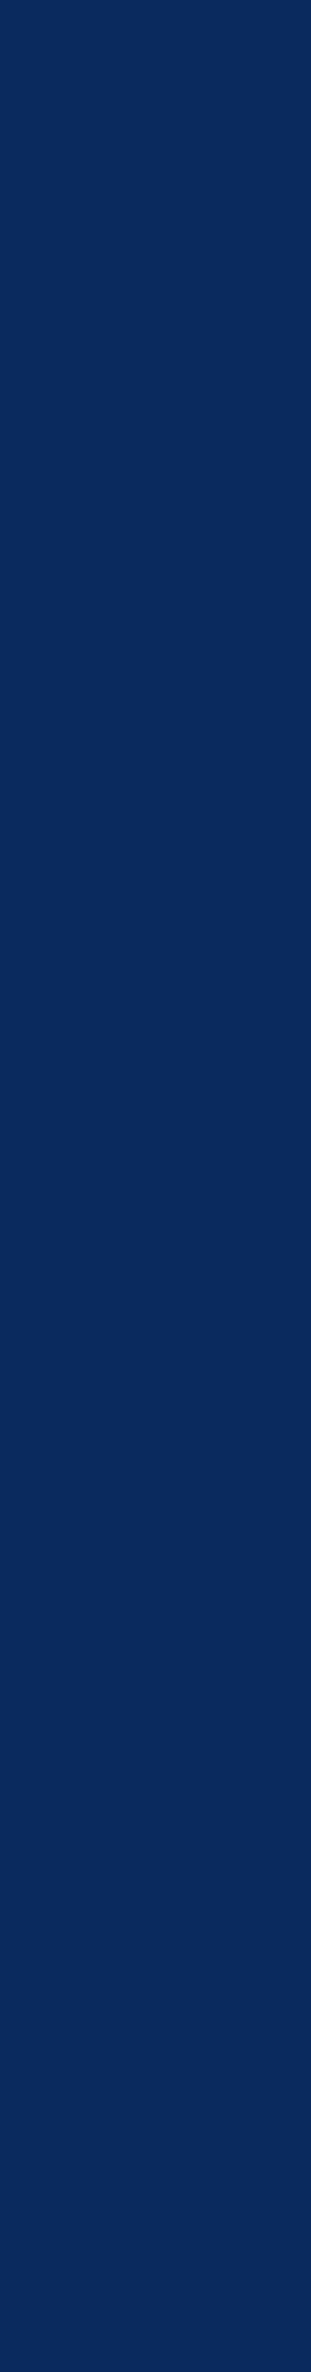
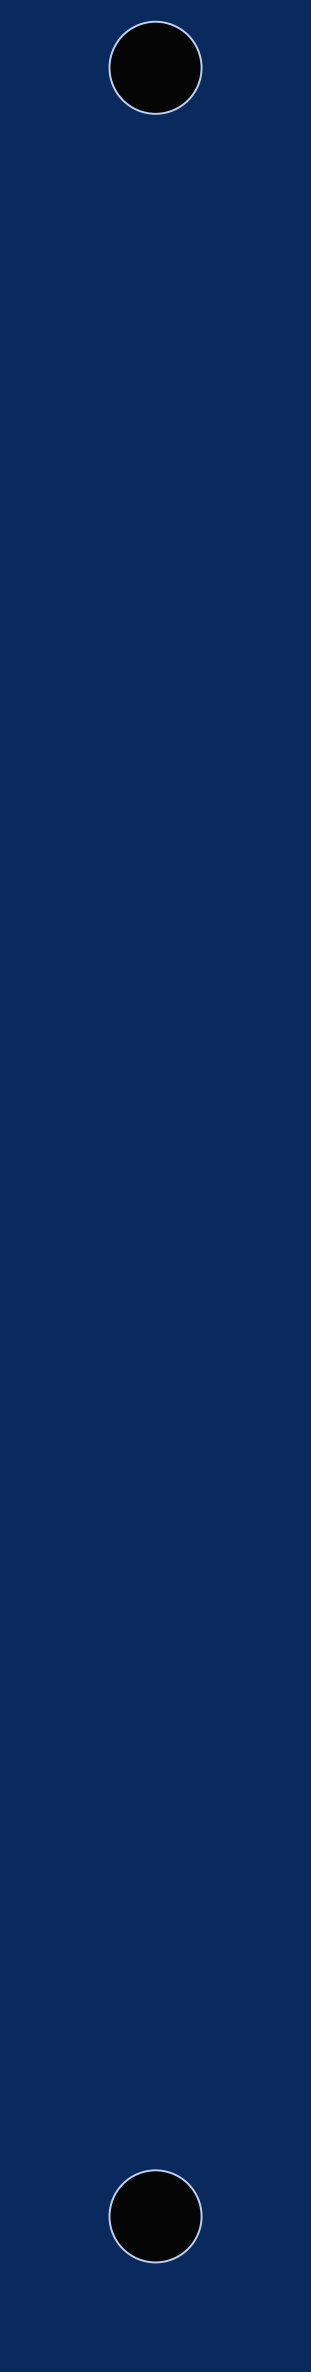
part: none -> (155, 67)
part: none -> (155, 2216)

